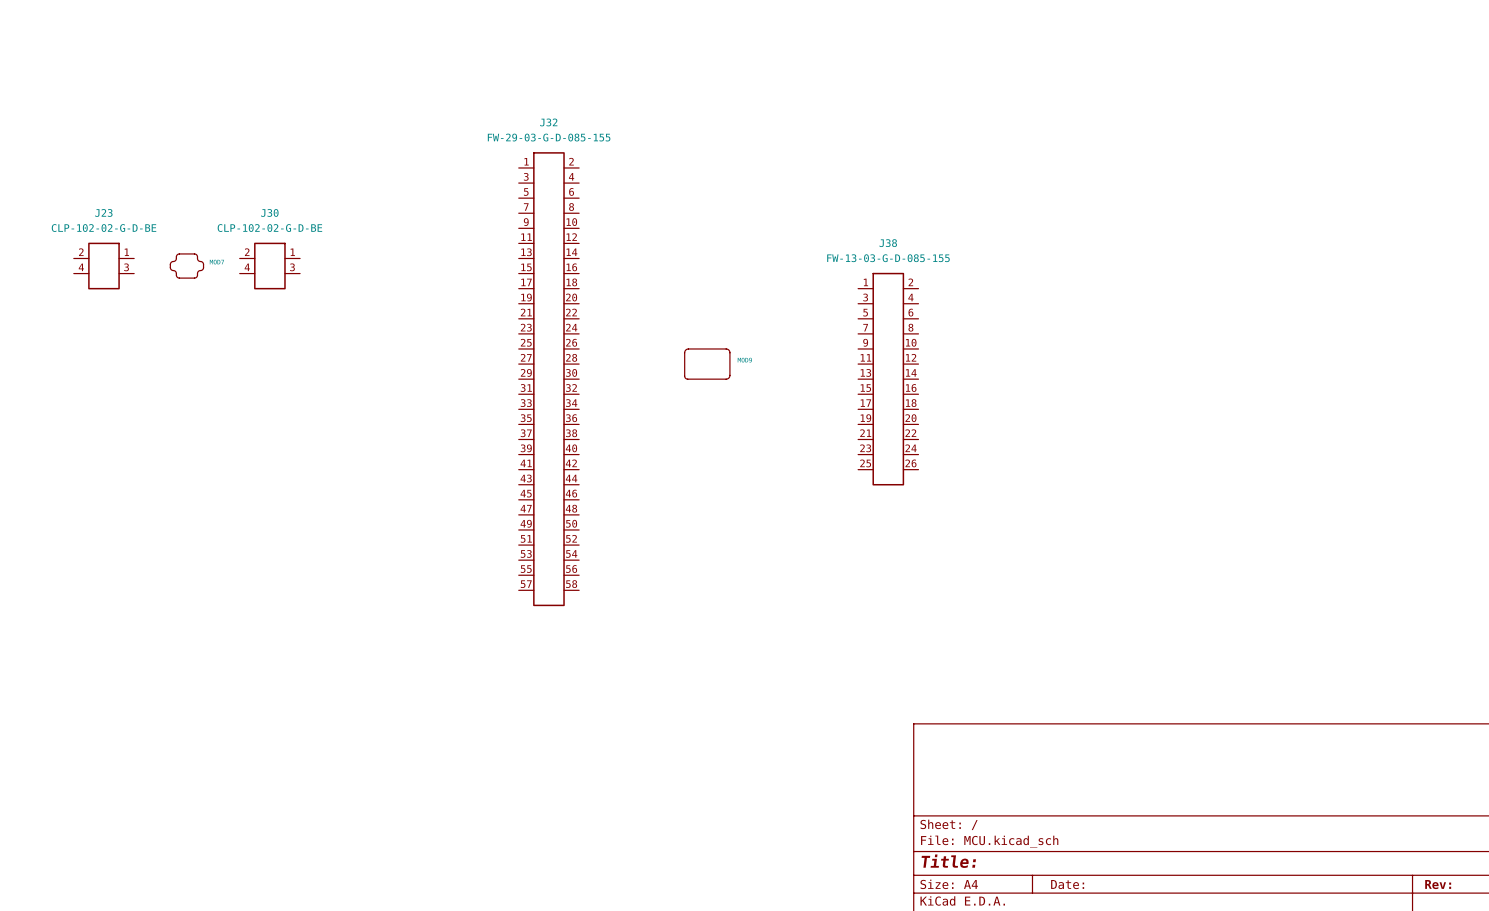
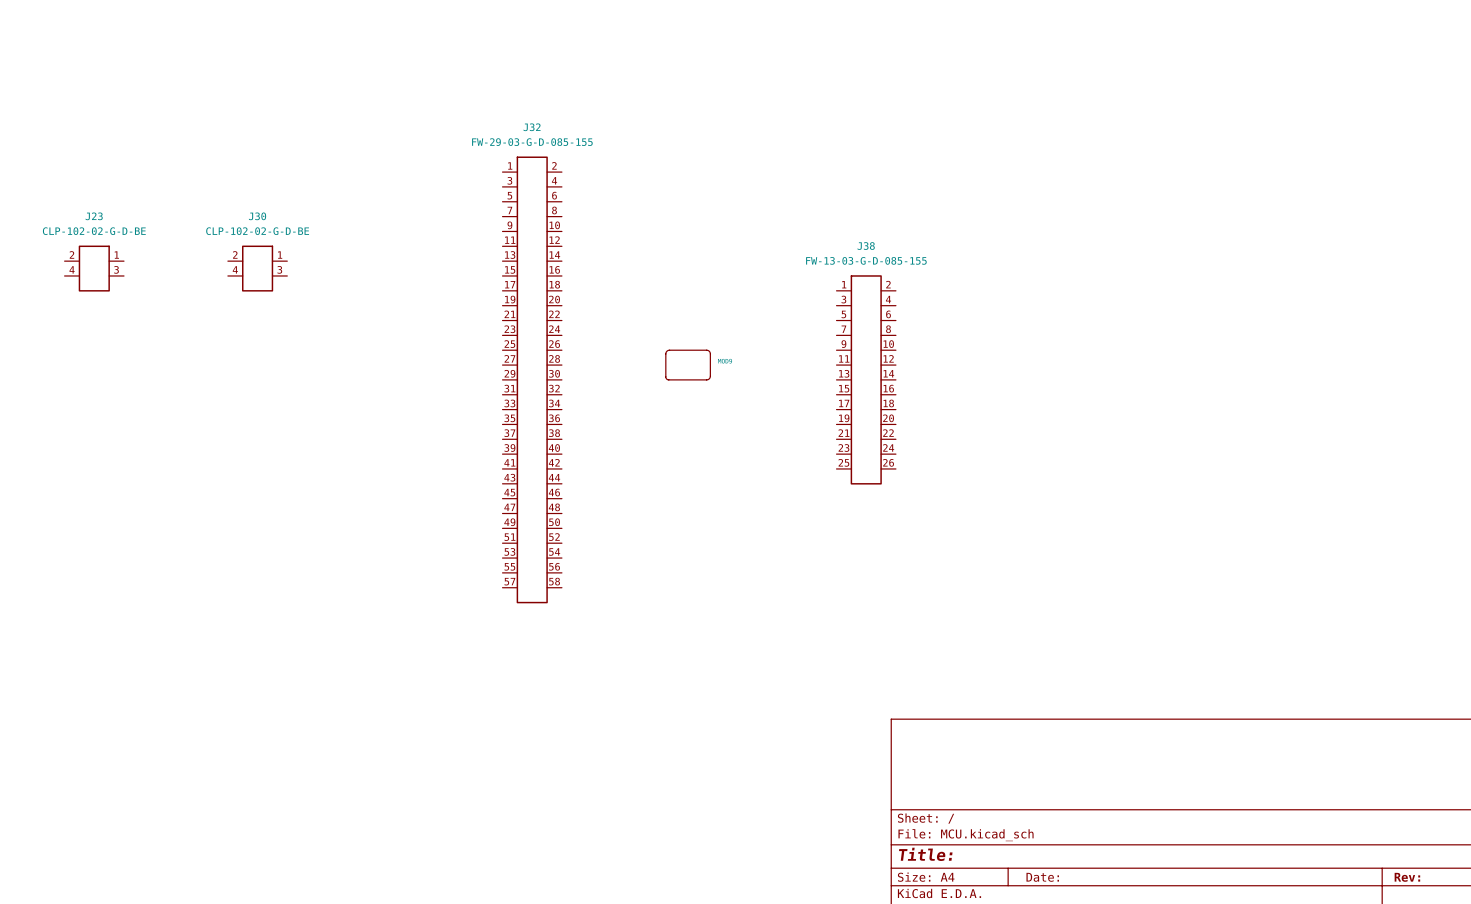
part: (186, 266) -> none

